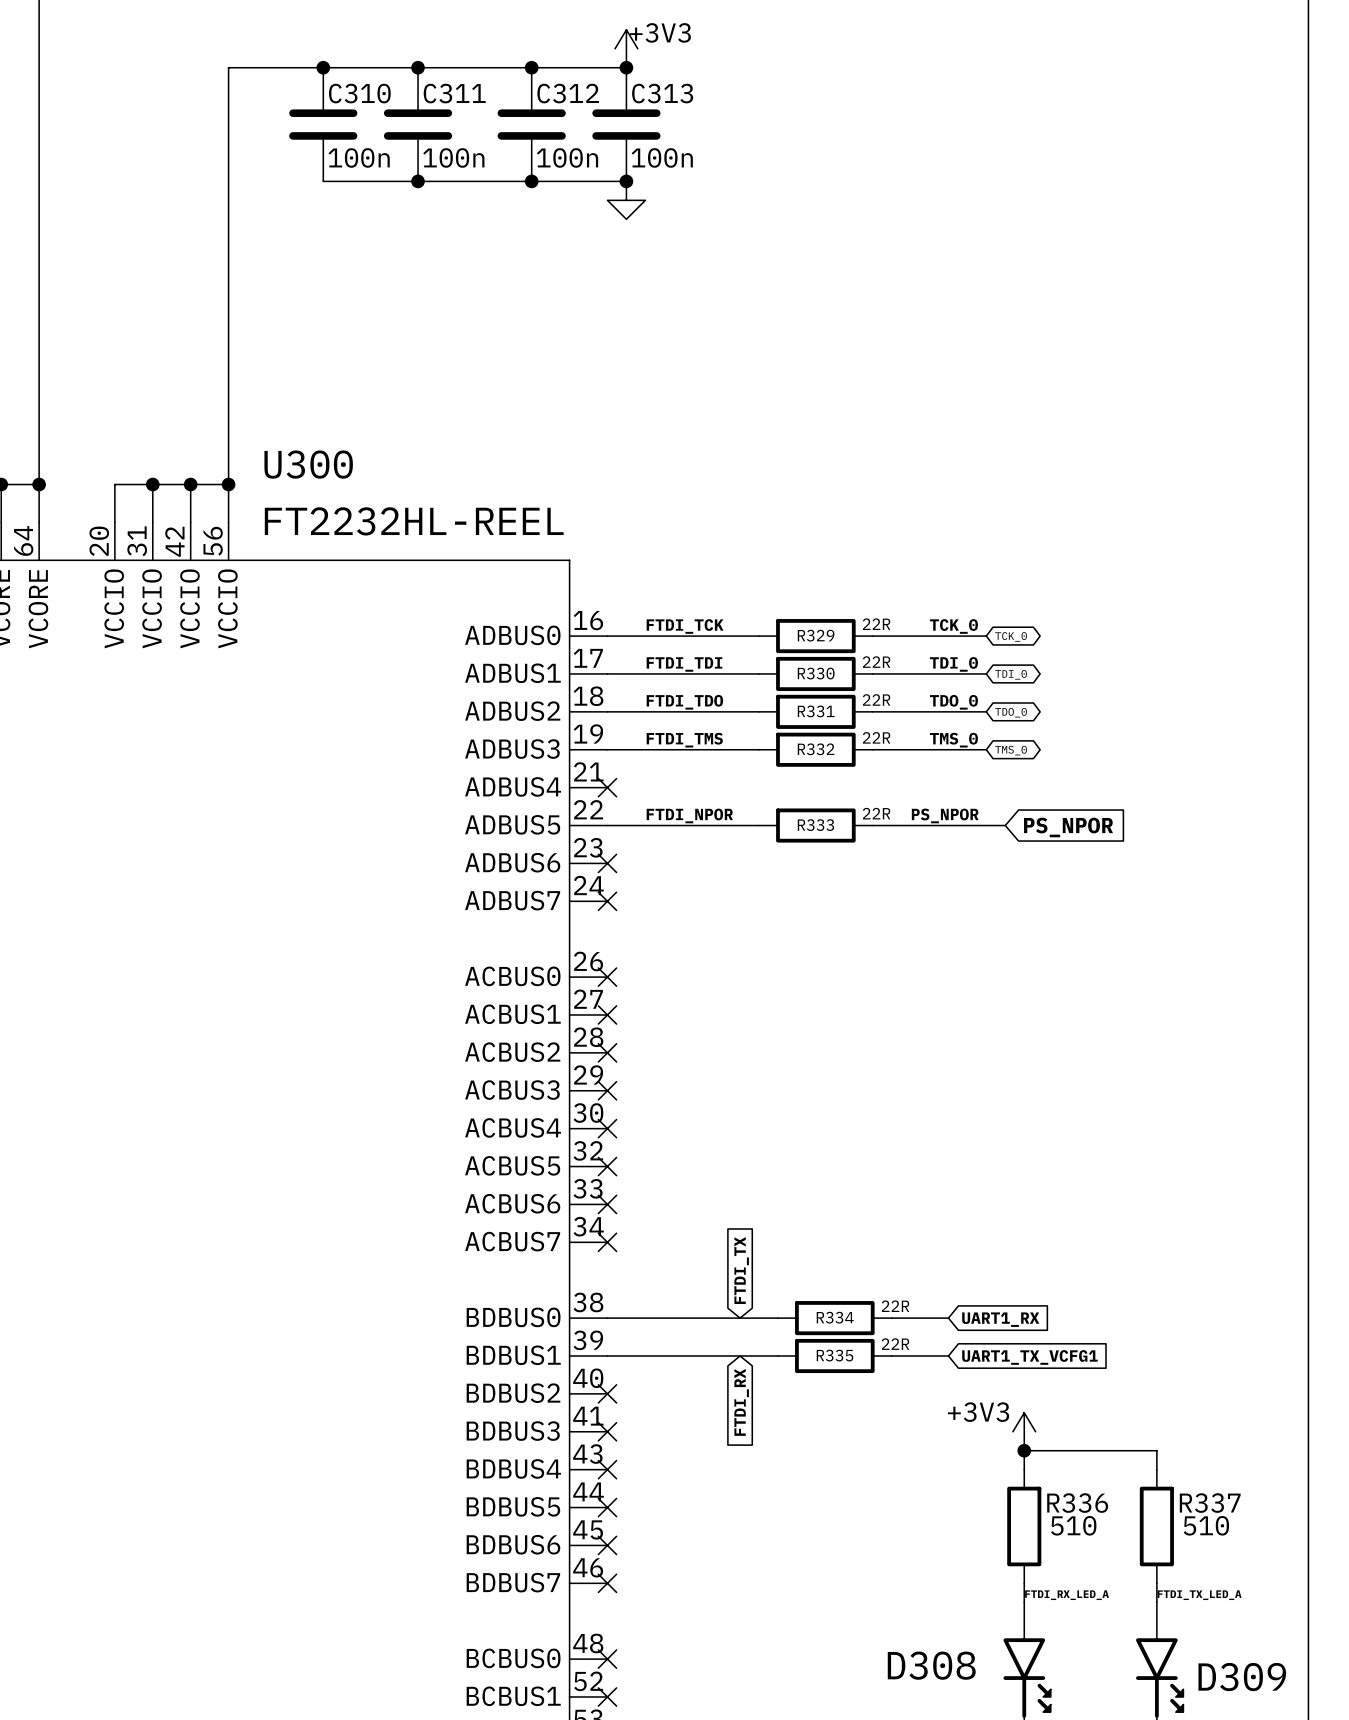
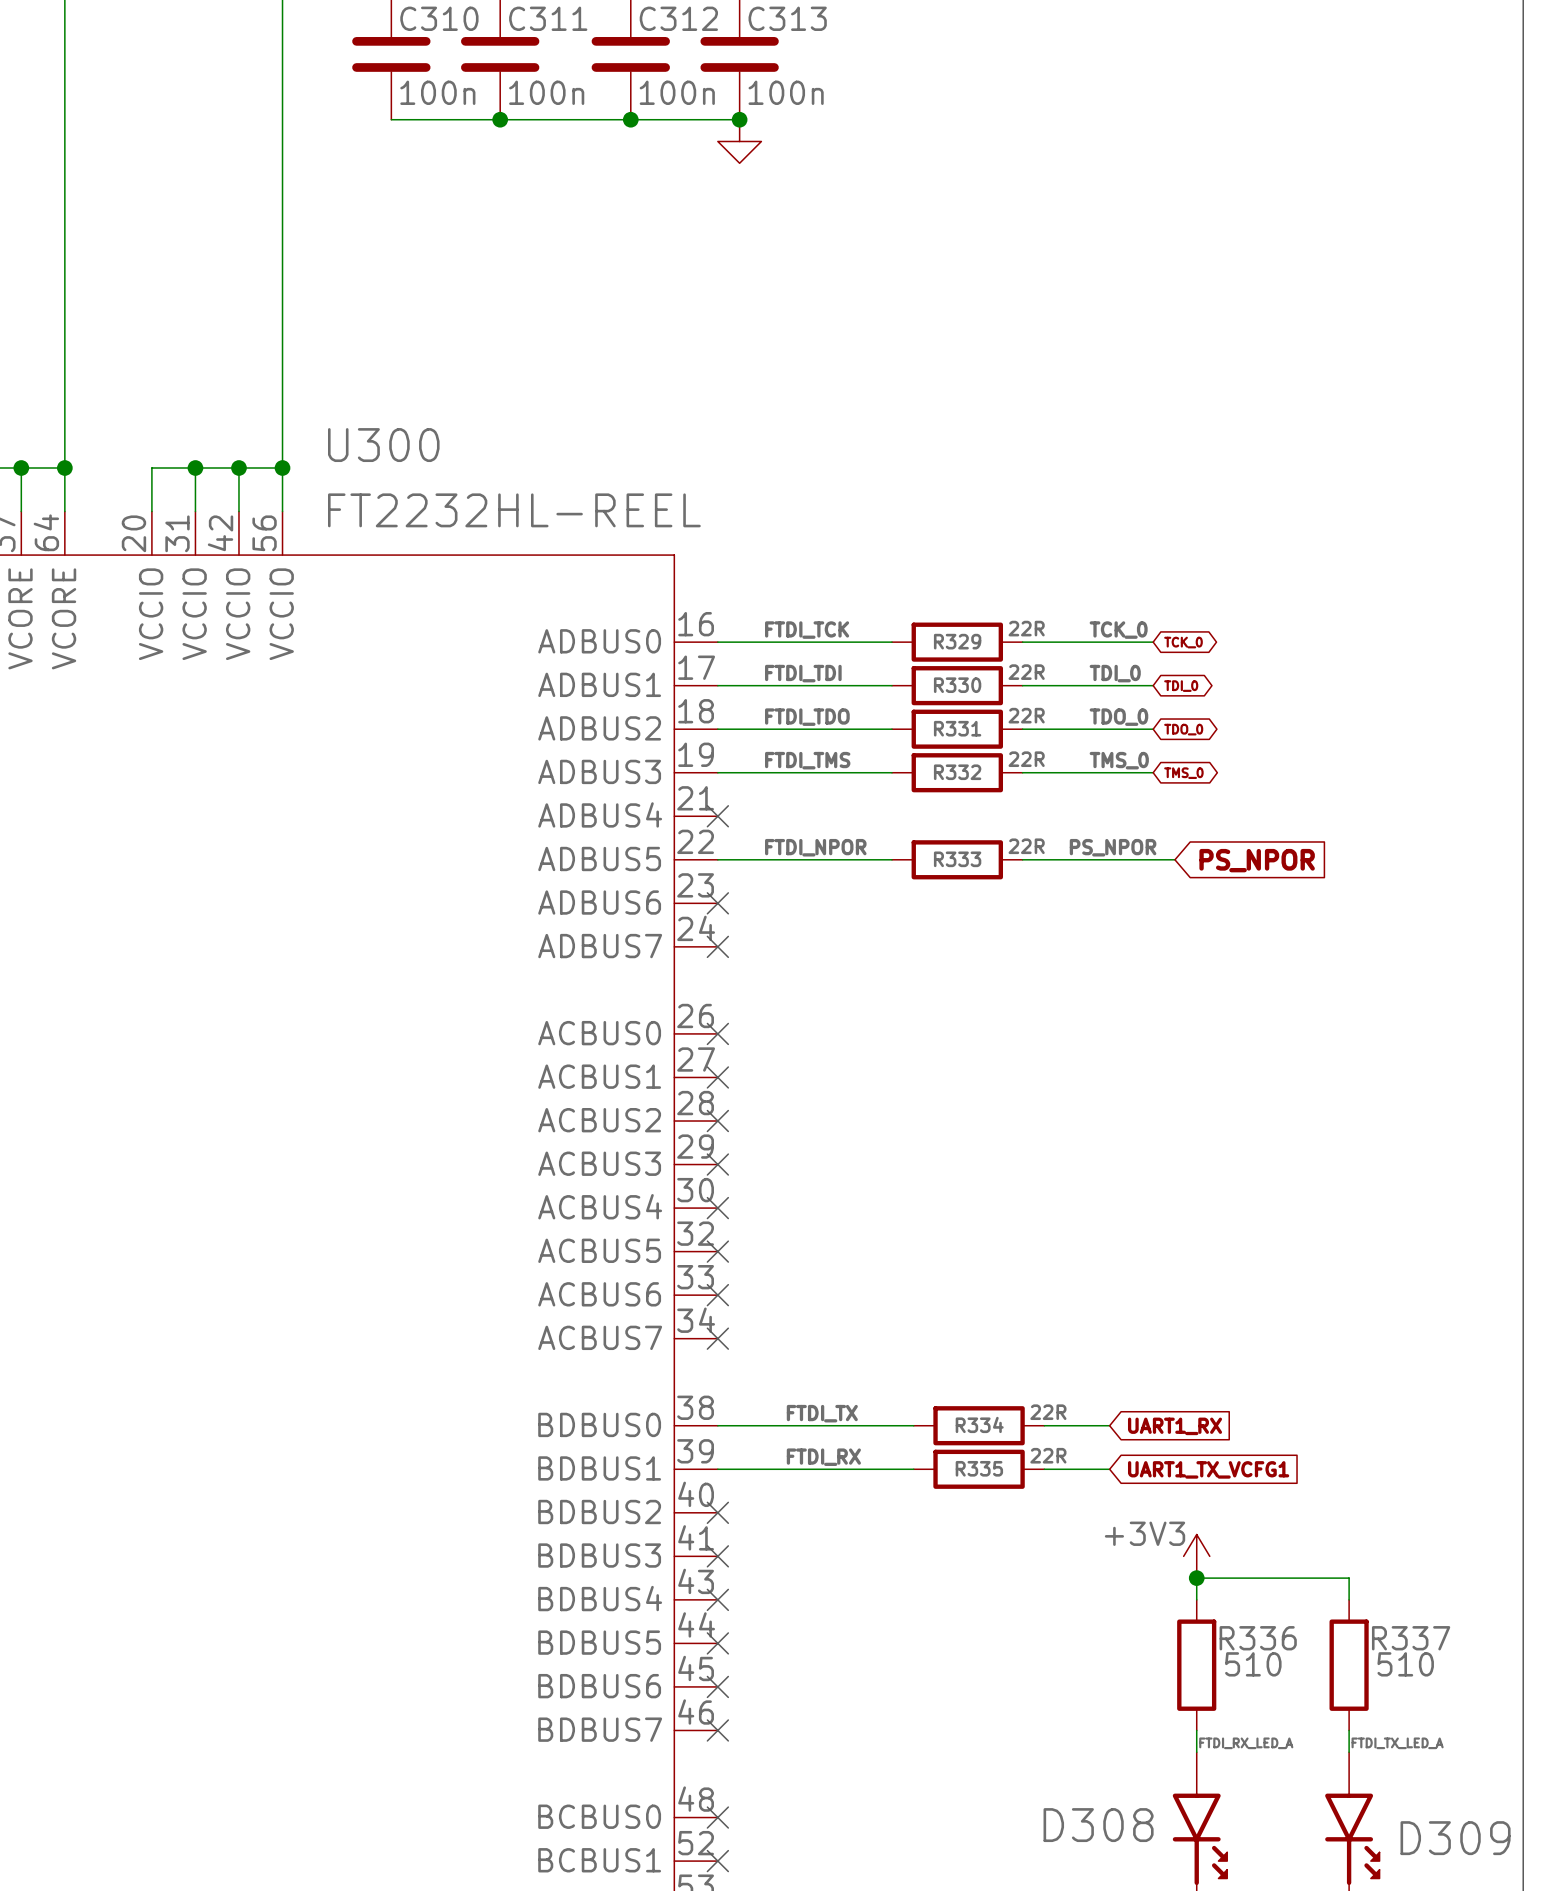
global label: FTDI_TX (741, 1270) -> none
label: none -> FTDI_TX (822, 1413)
label: none -> FTDI_RX (823, 1457)
global label: FTDI_RX (741, 1402) -> none

